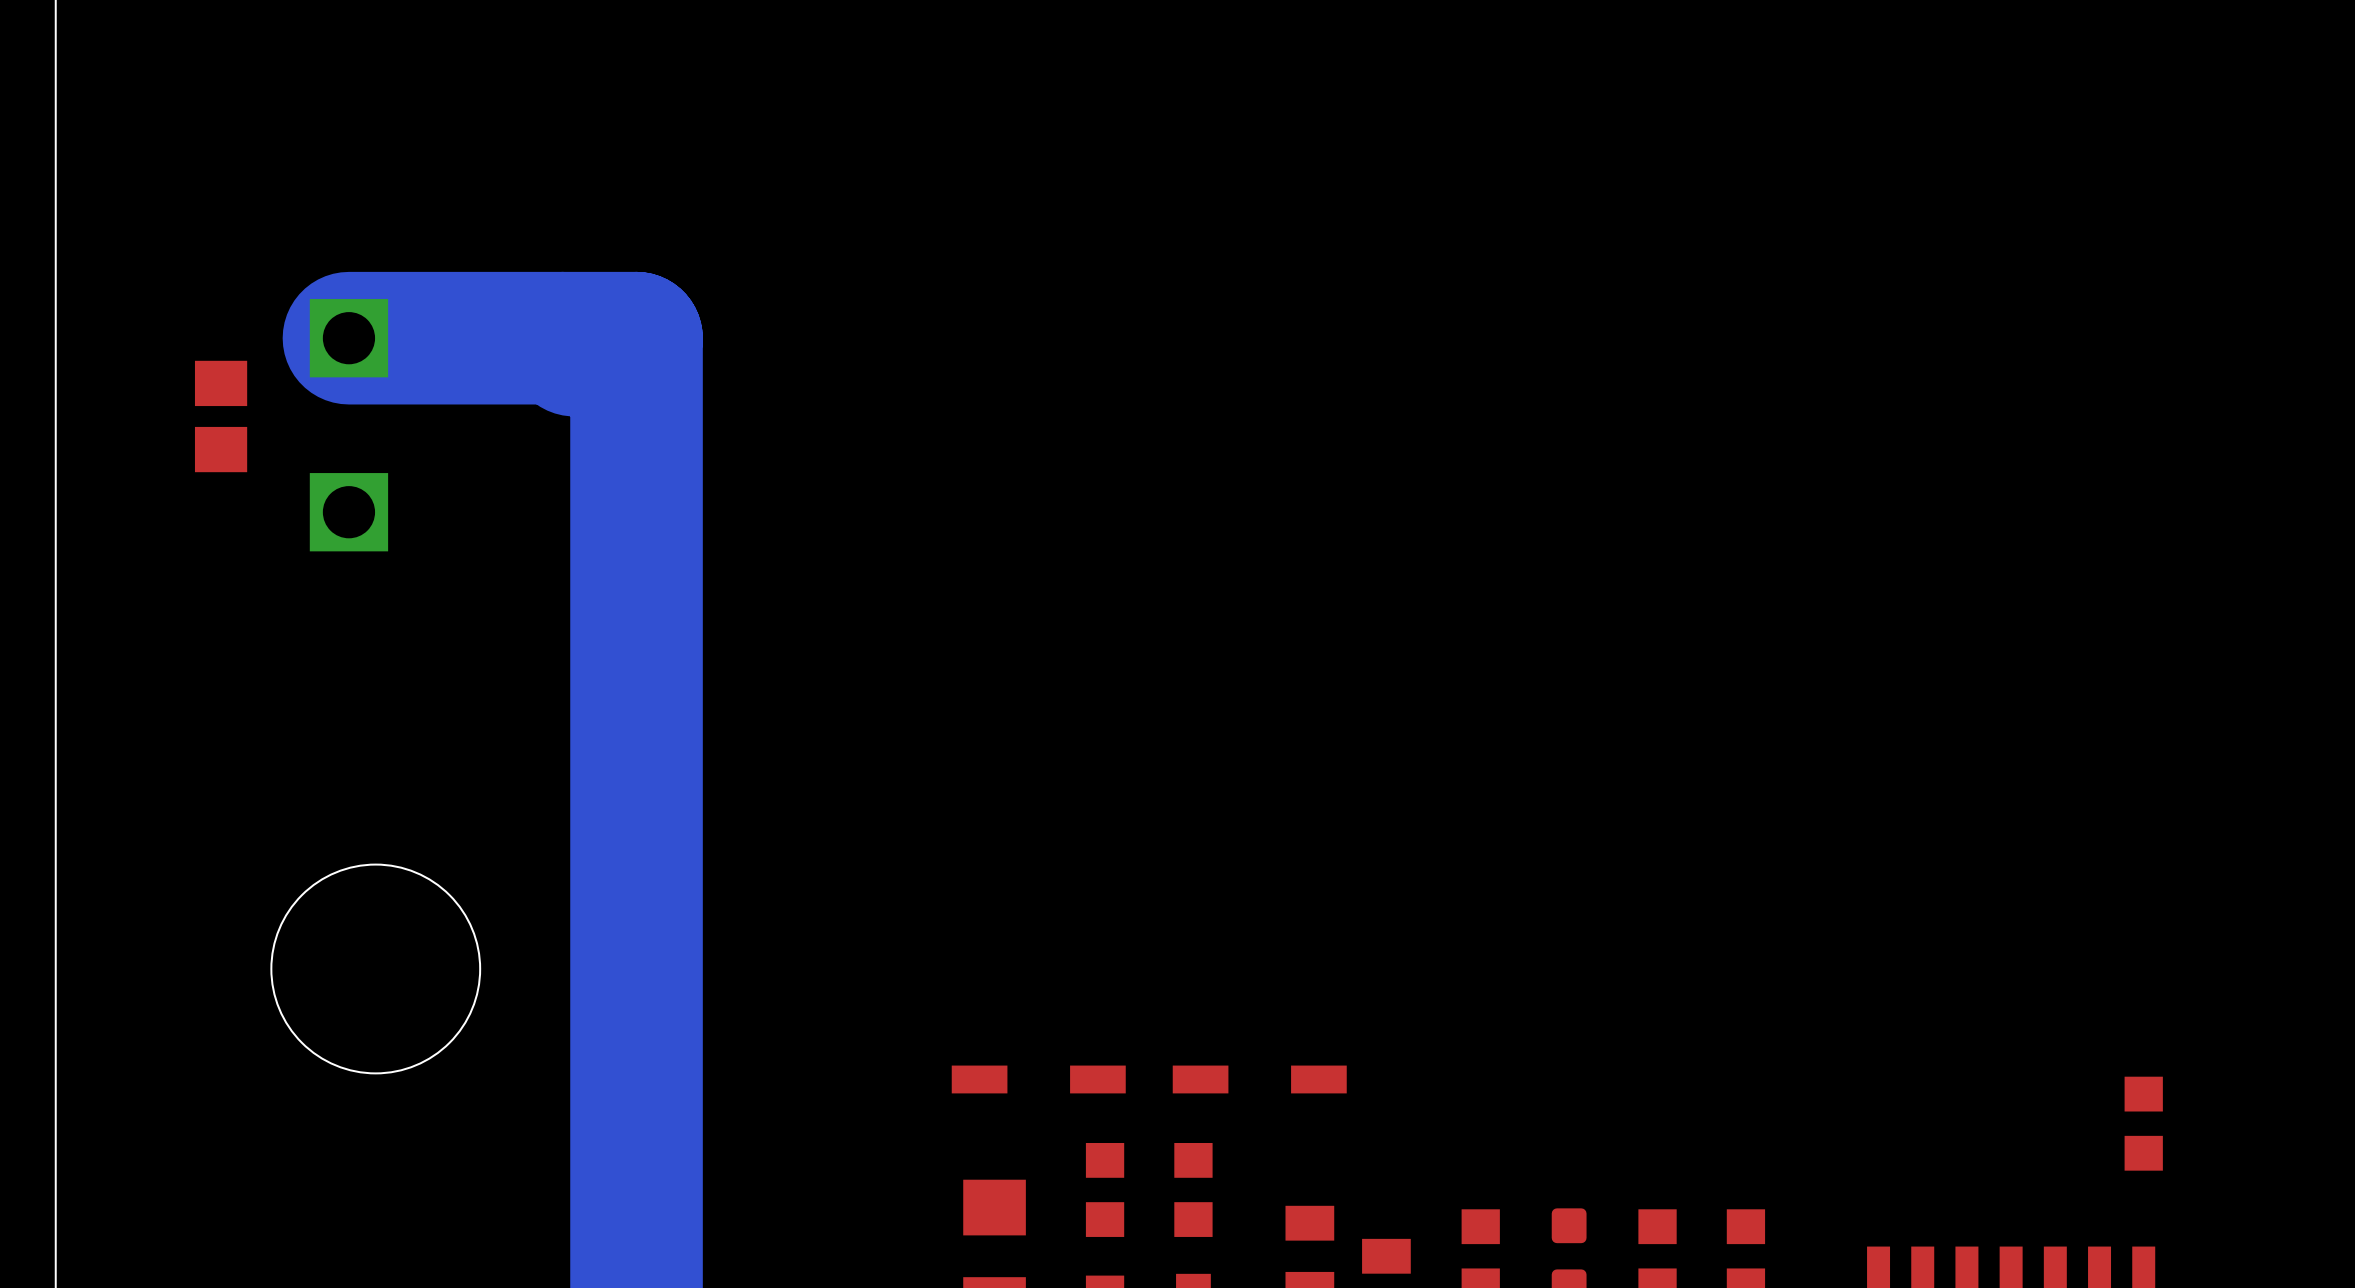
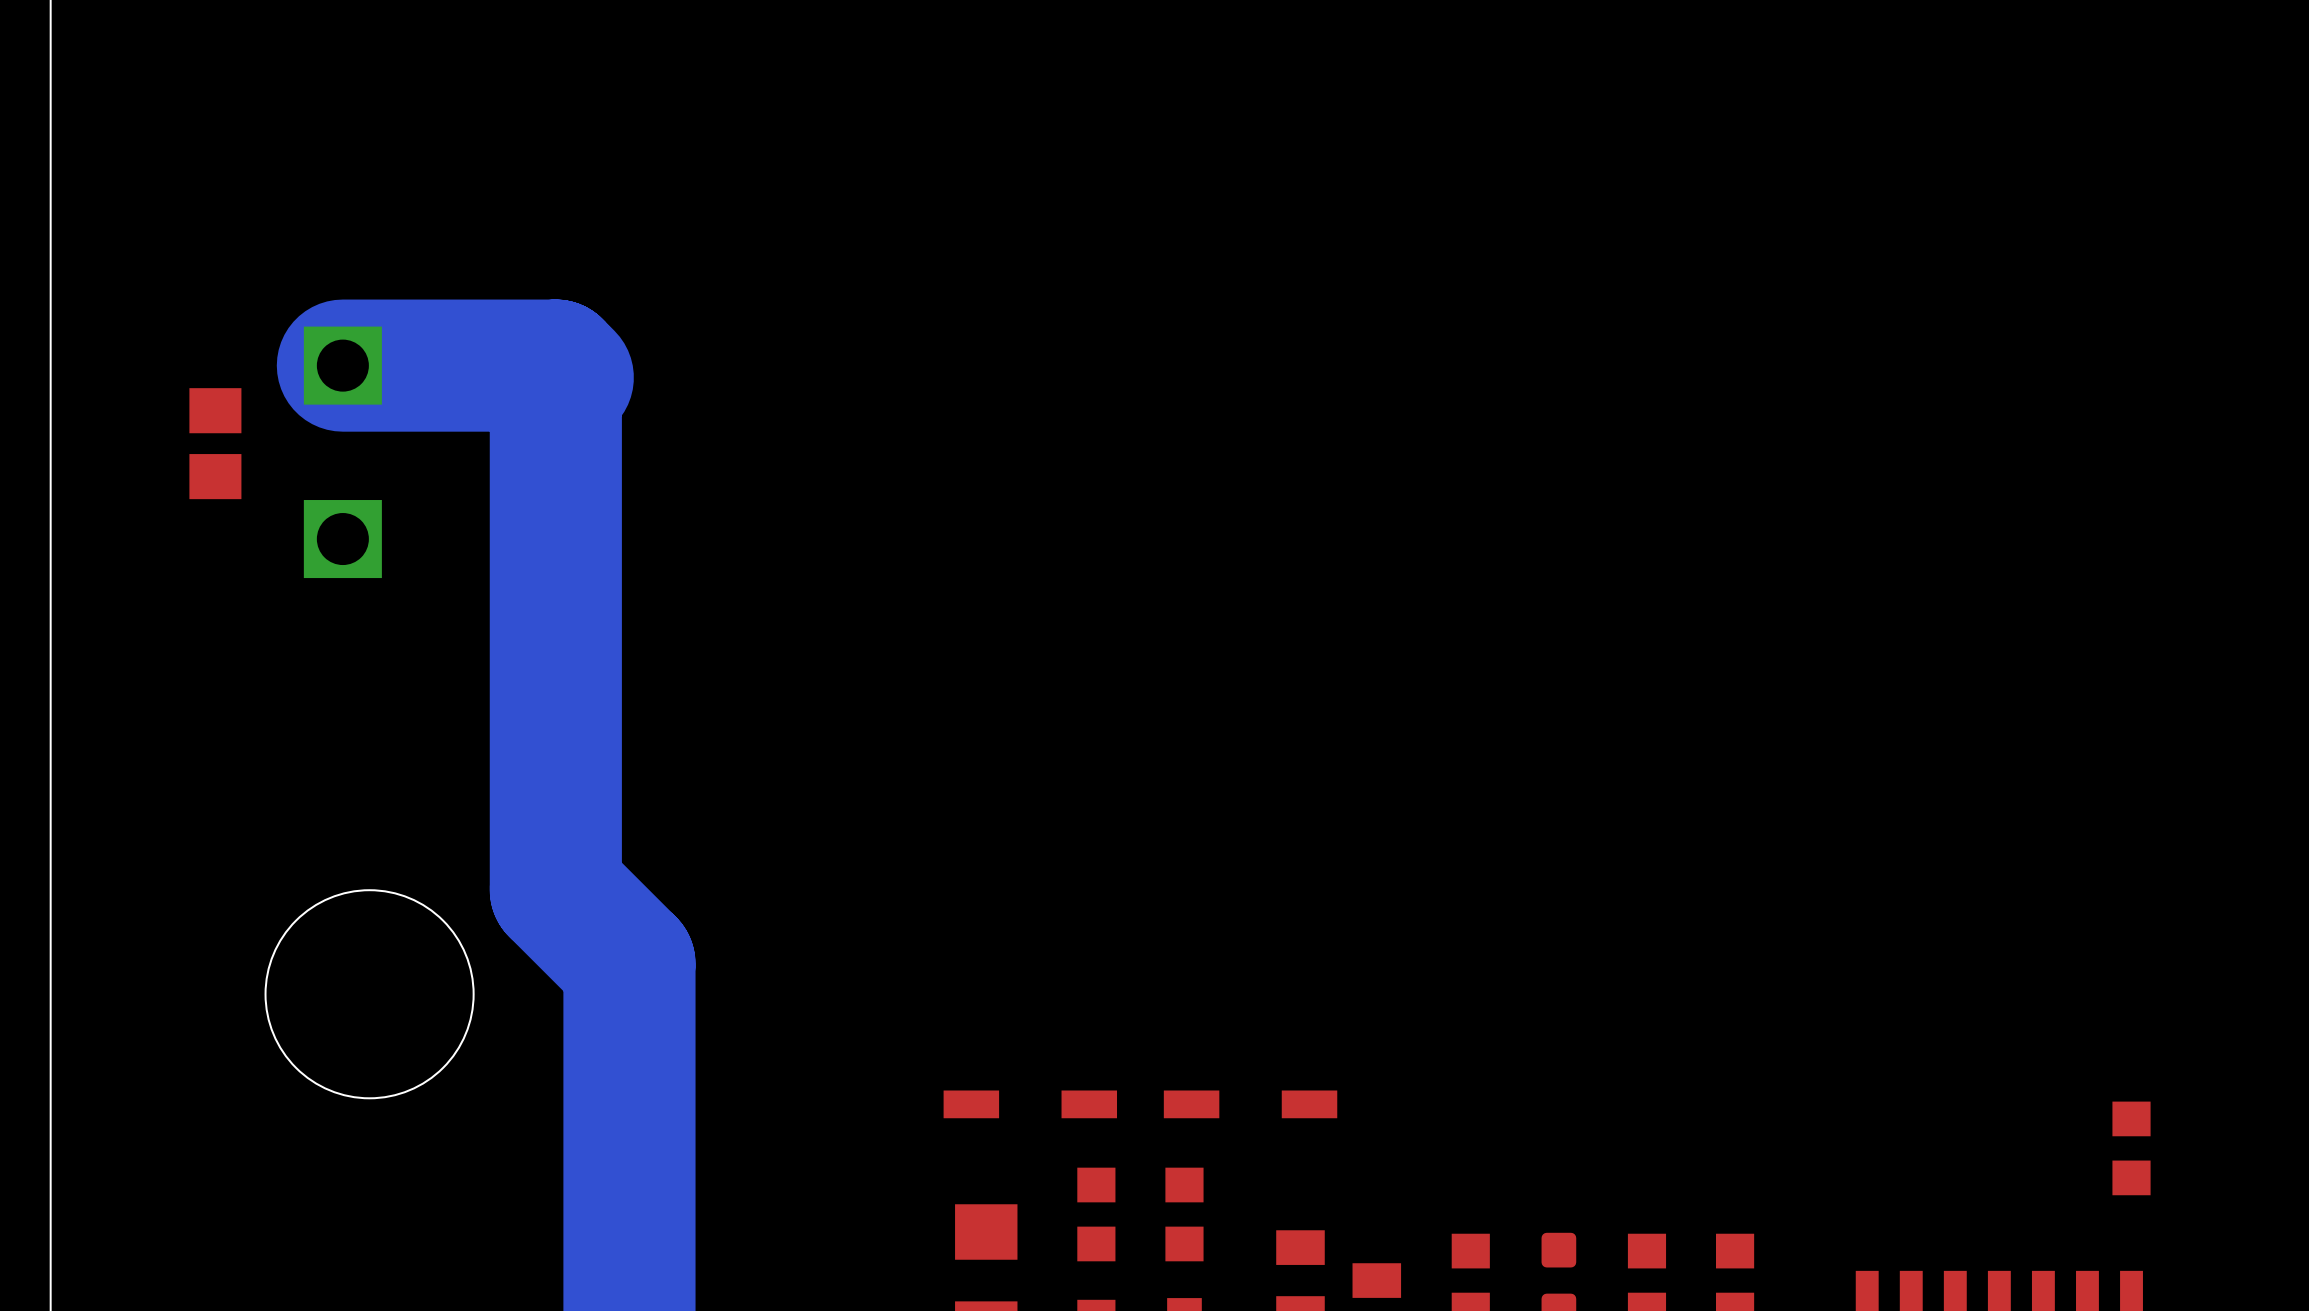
bottom track: (562, 338) (636, 338) (636, 938) -> (555, 365) (555, 890) (629, 963)

